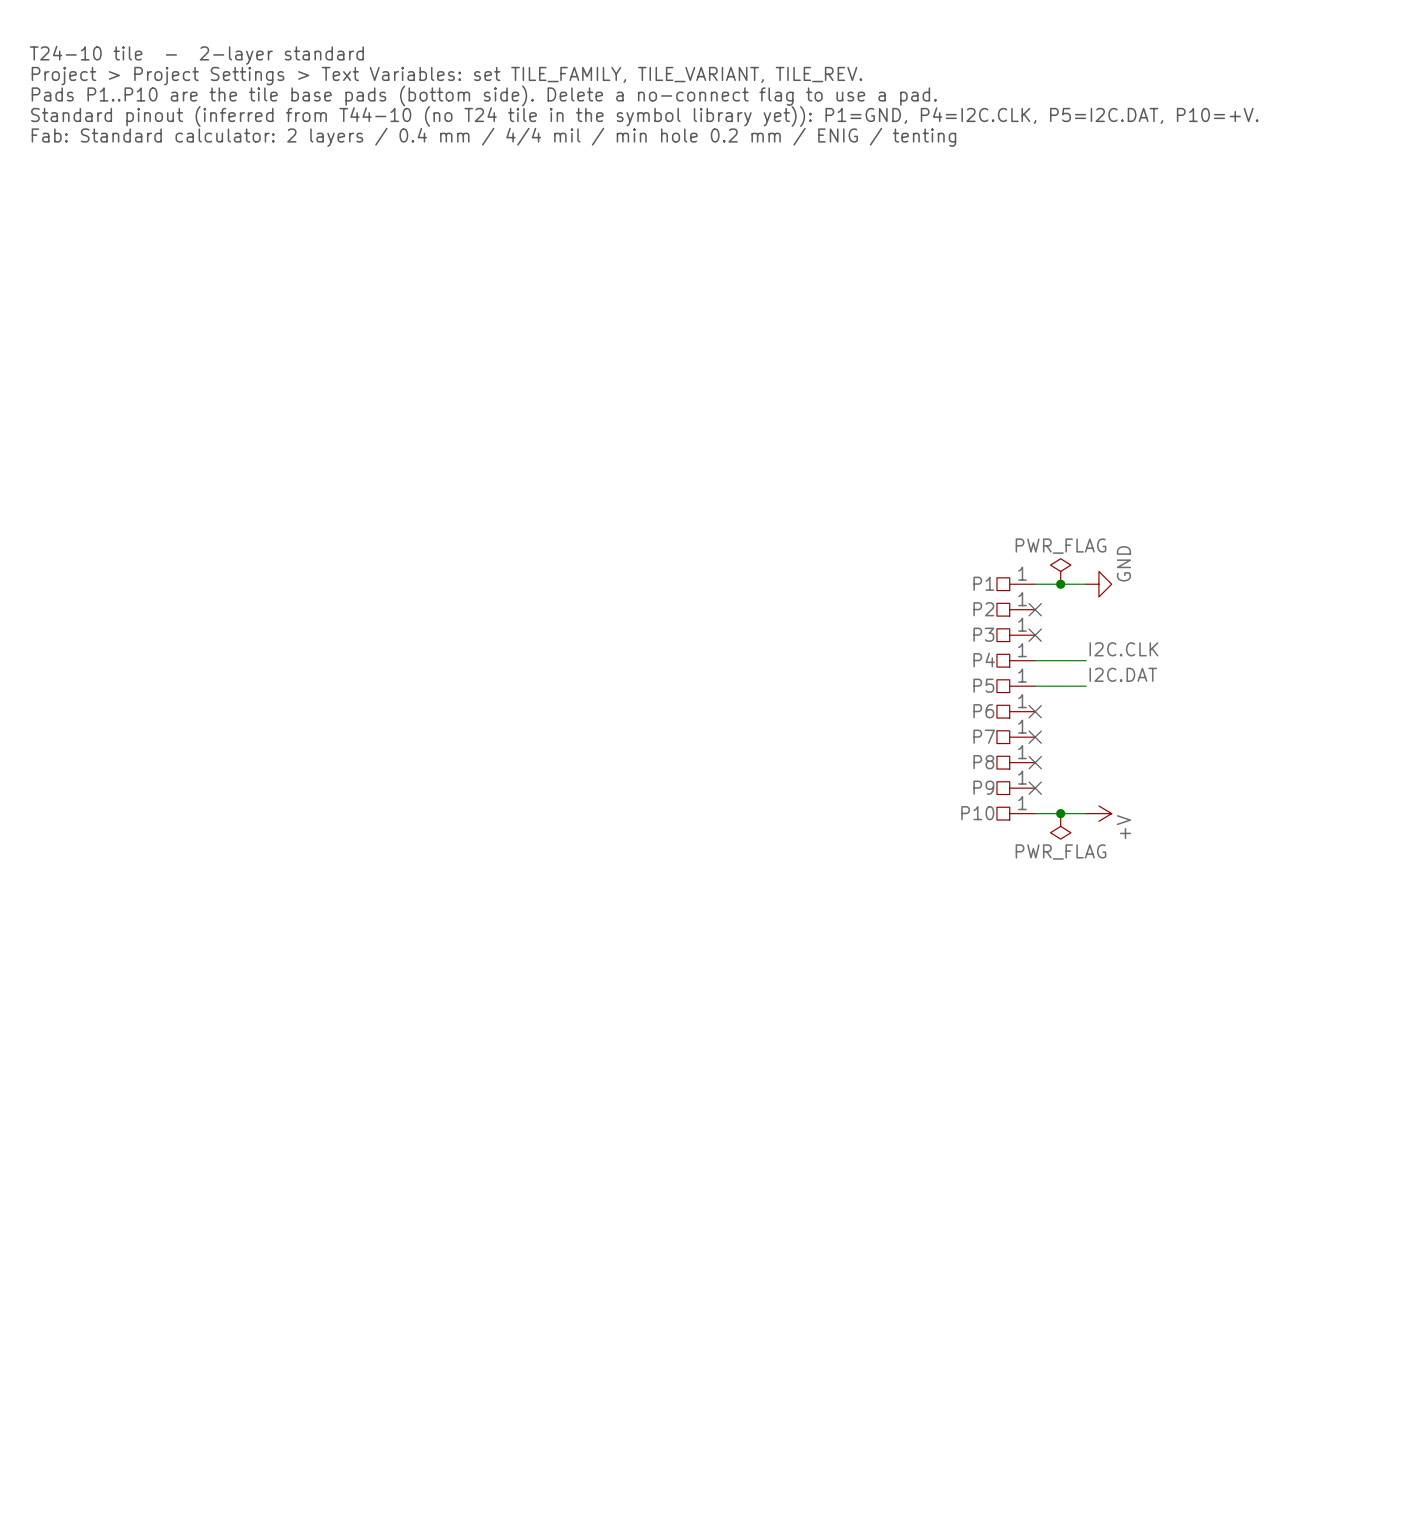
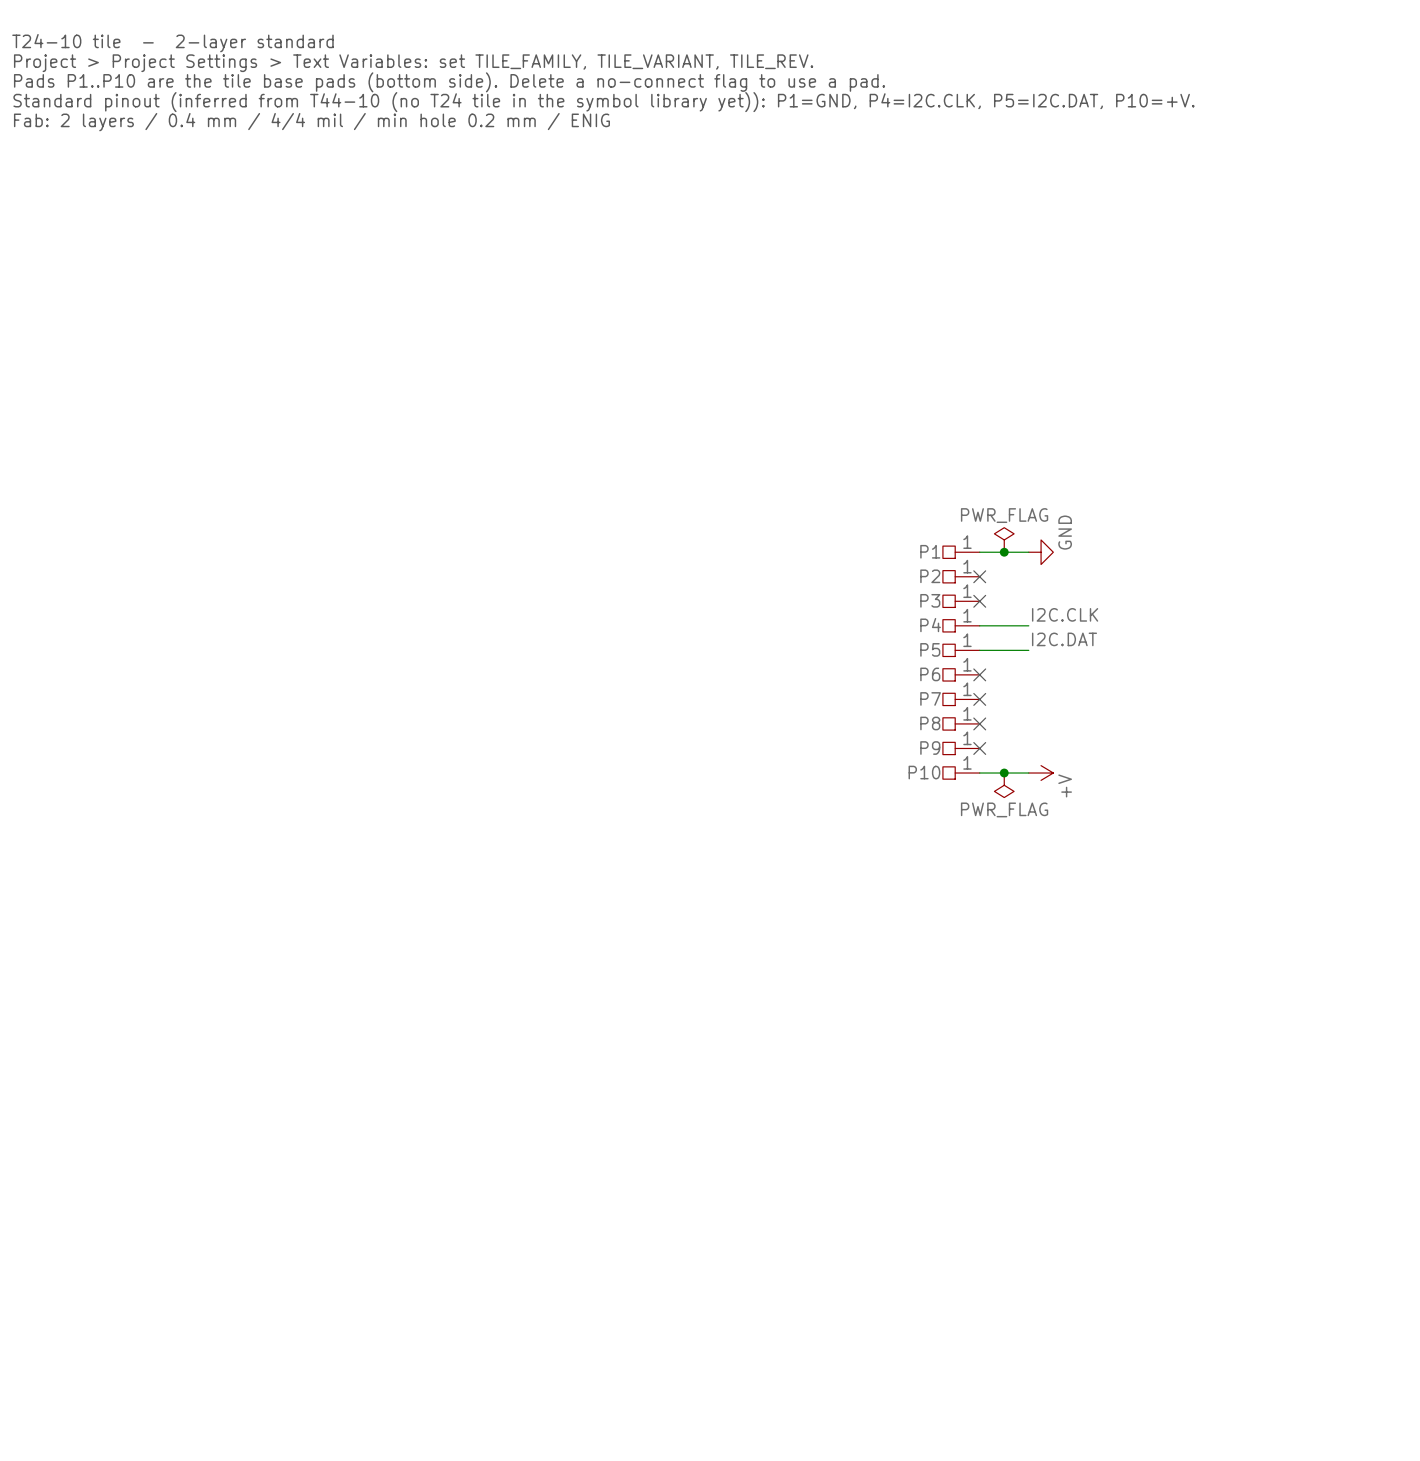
text: Fab: Standard calculator: 2 layers / 0.4 mm / 4/4 mil / min hole 0.2 mm / ENIG / tenting (493, 137) -> Fab: 2 layers / 0.4 mm / 4/4 mil / min hole 0.2 mm / ENIG (311, 122)

